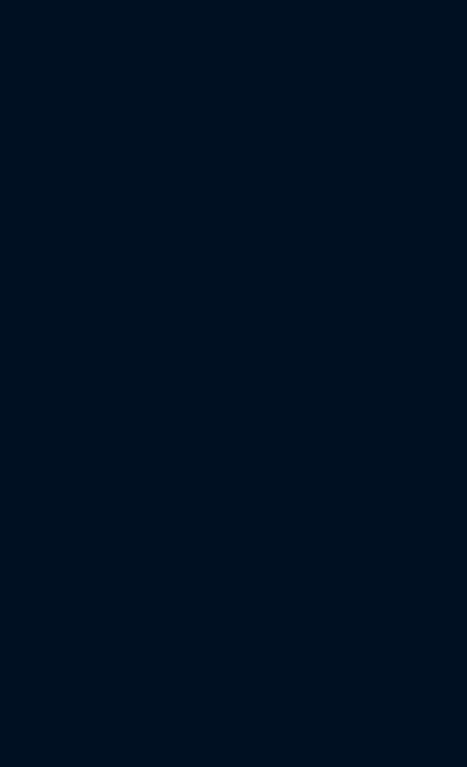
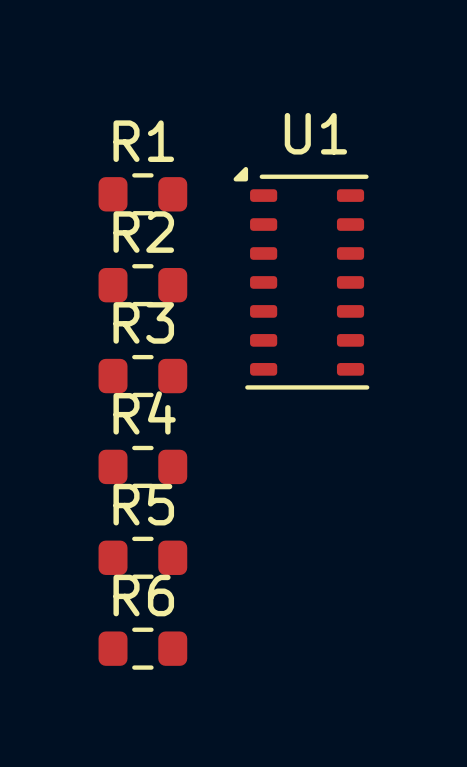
R1: none -> (142, 194)
U1: none -> (301, 278)
R2: none -> (142, 285)
R3: none -> (142, 376)
R4: none -> (142, 466)
R5: none -> (142, 557)
R6: none -> (142, 648)

